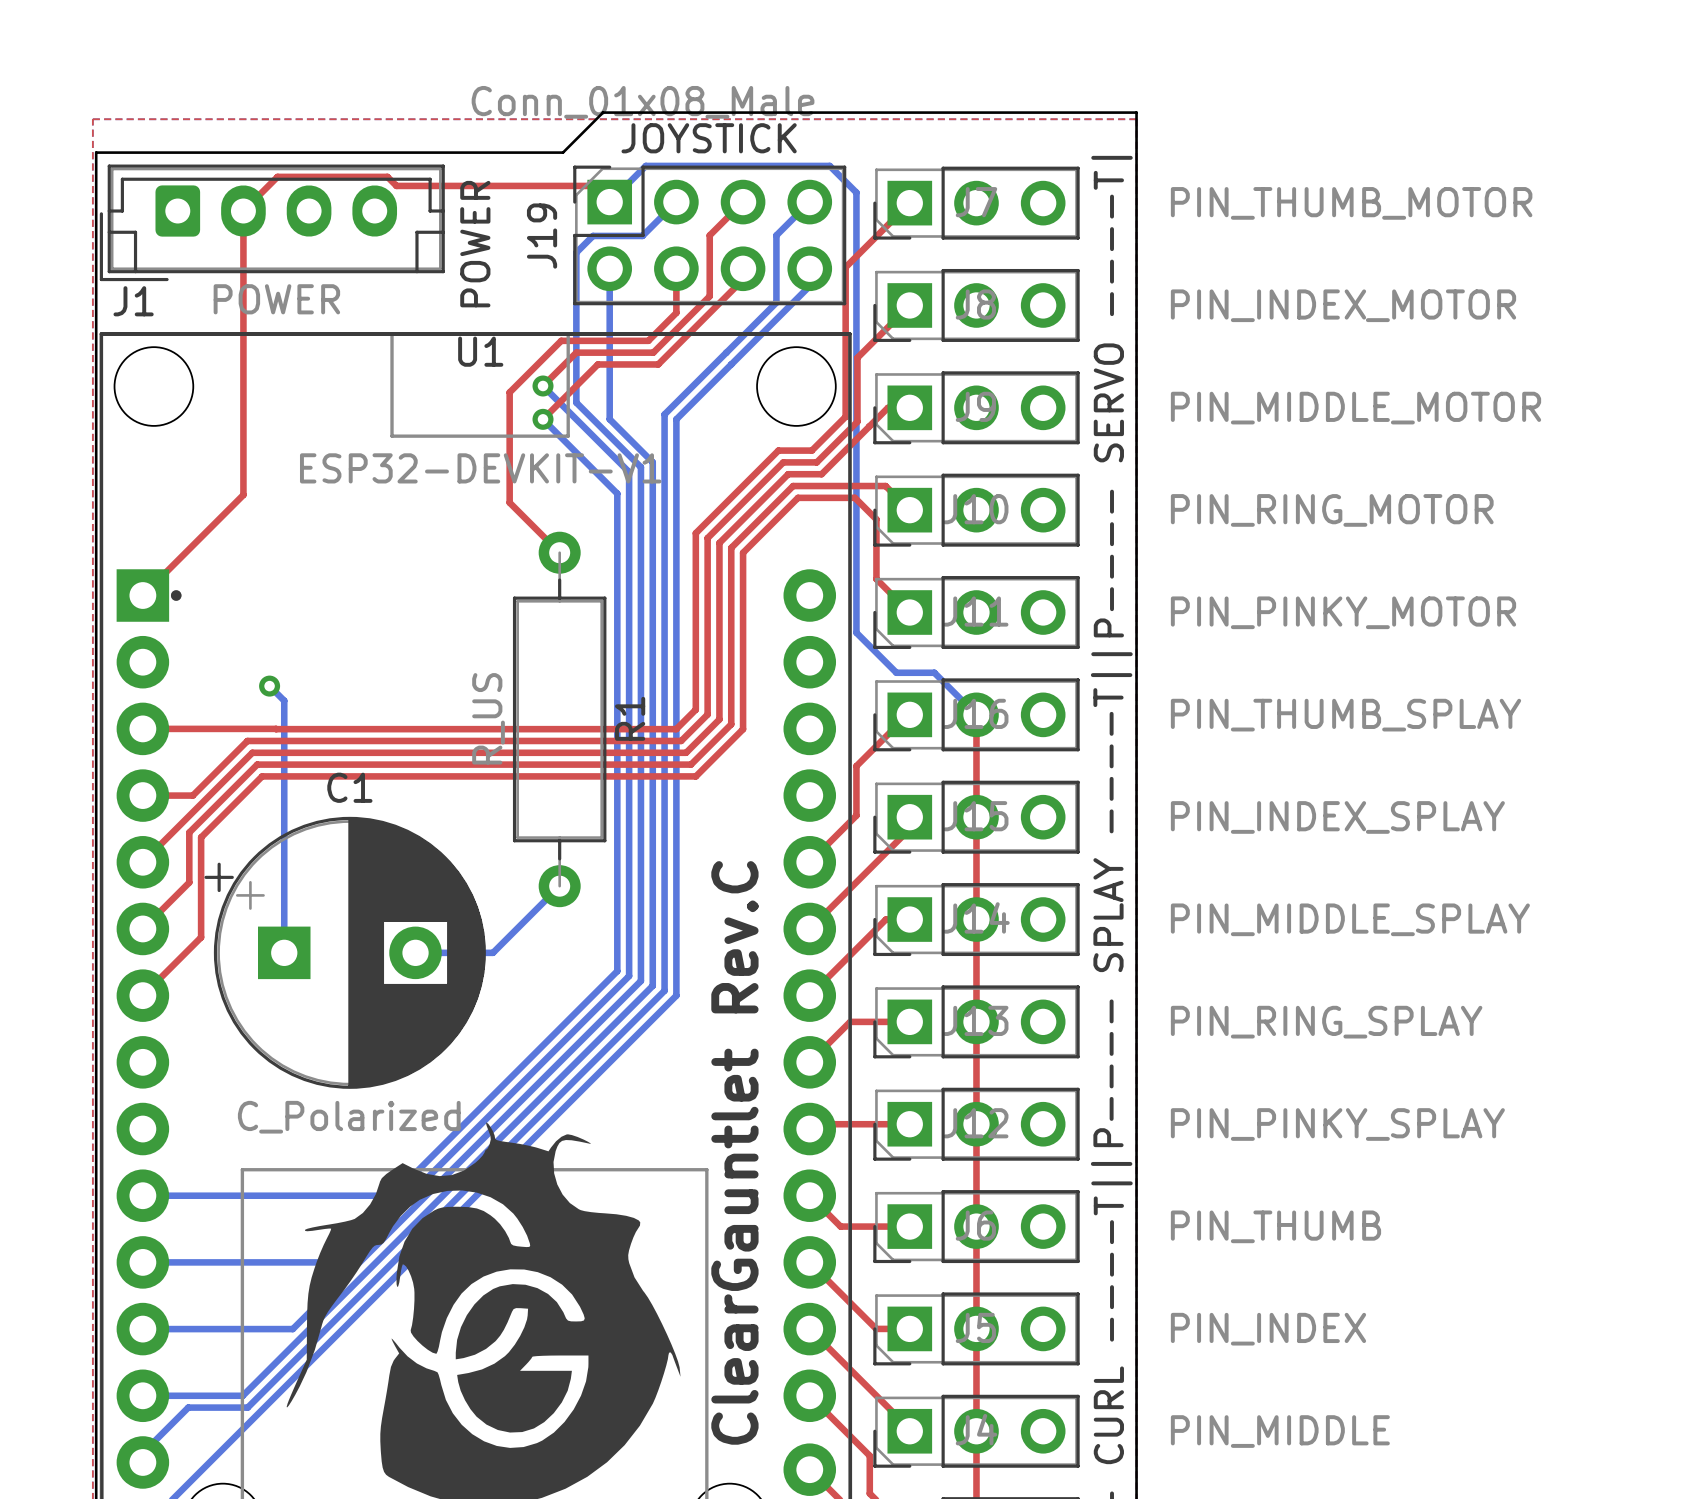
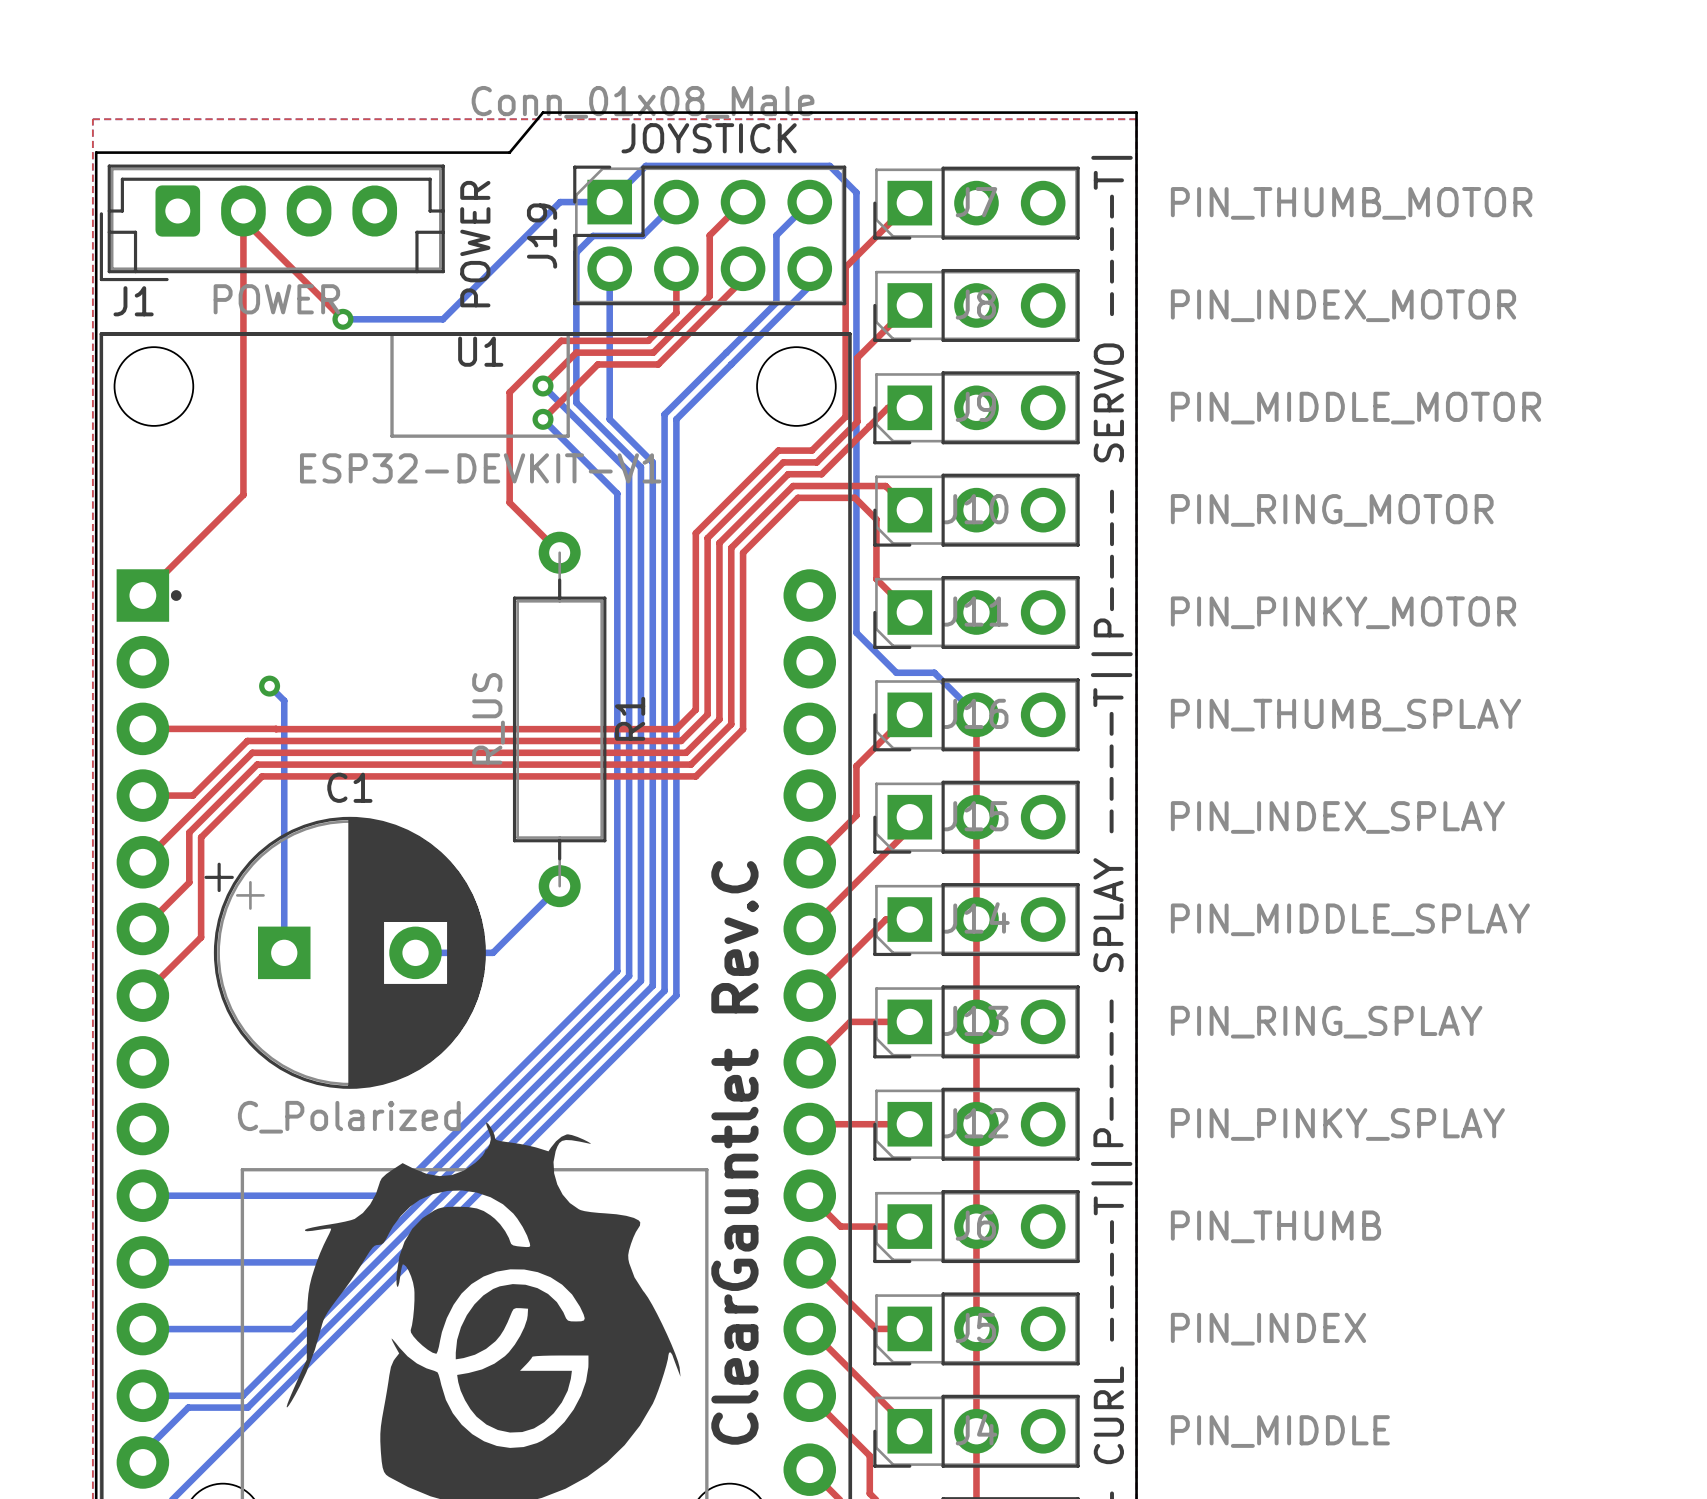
board edge: (603, 112) (563, 152) (509, 152) -> (603, 112) (543, 112) (509, 152)
top track: (593, 185) (396, 185) (387, 176) (277, 176) (243, 211) -> (342, 319) (243, 219) (243, 211)
bottom track: none -> (609, 202) (560, 202) (442, 319) (342, 319)
via: none -> (342, 319)

